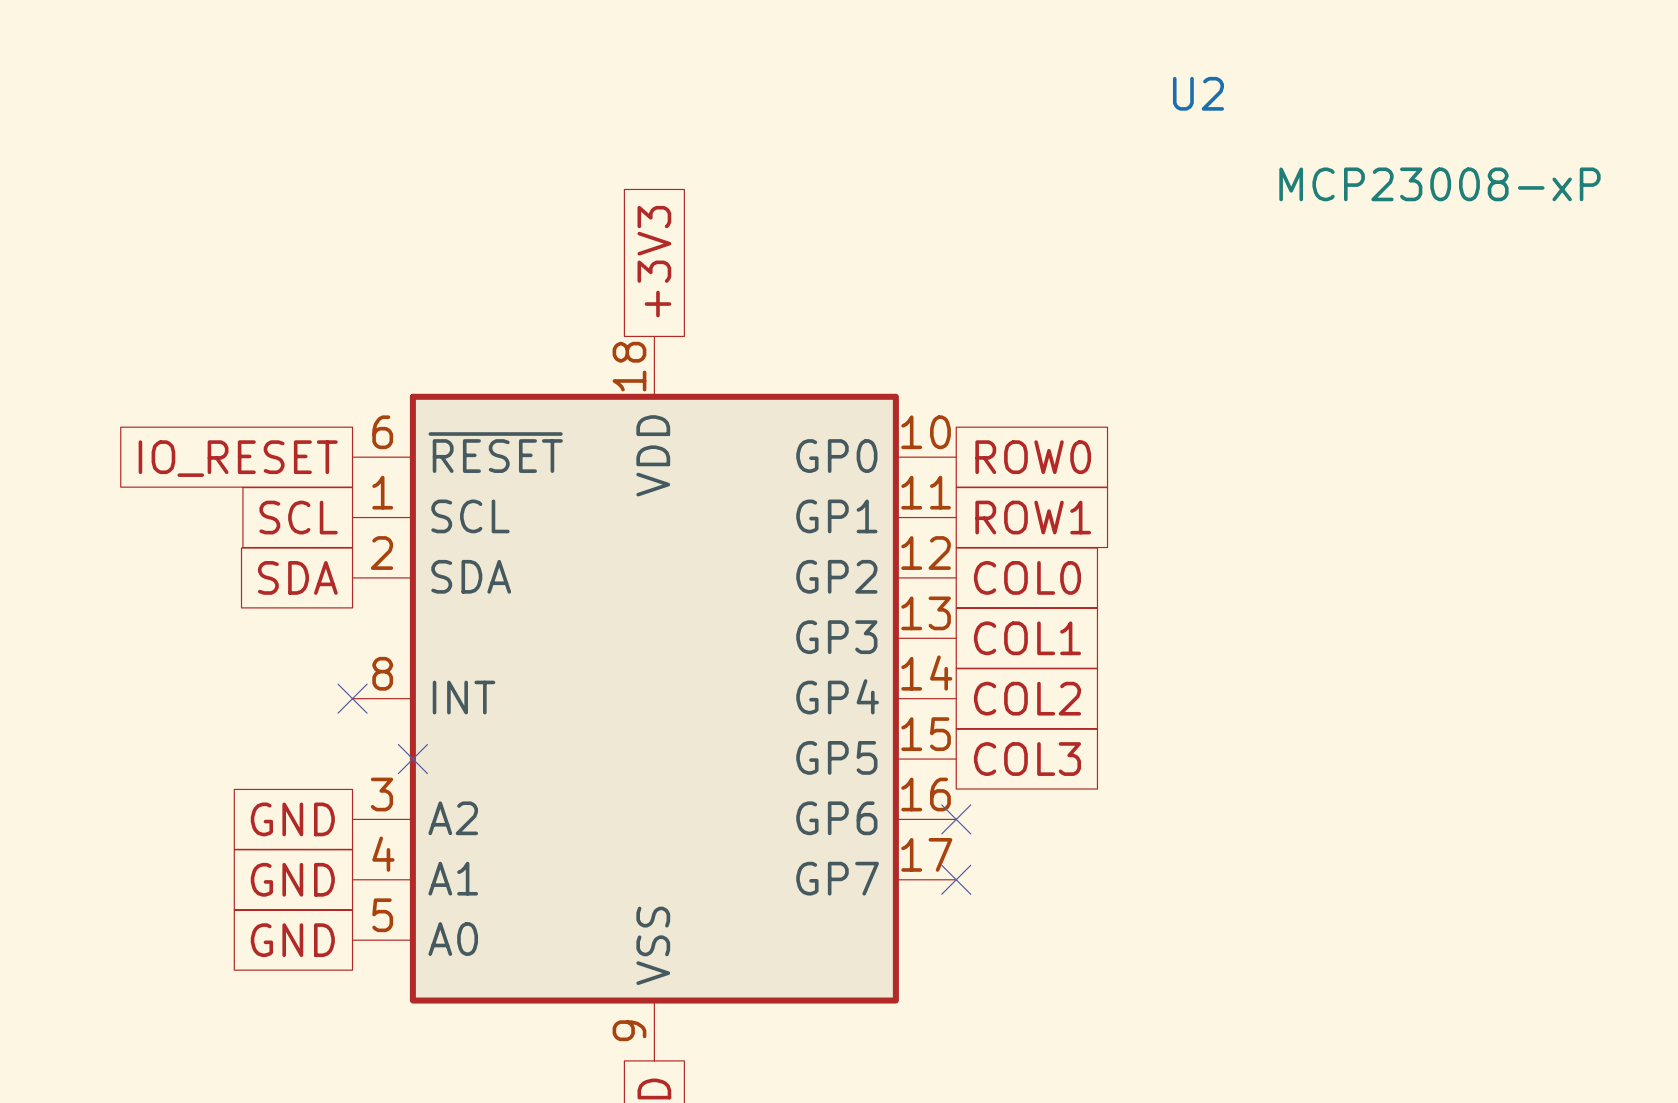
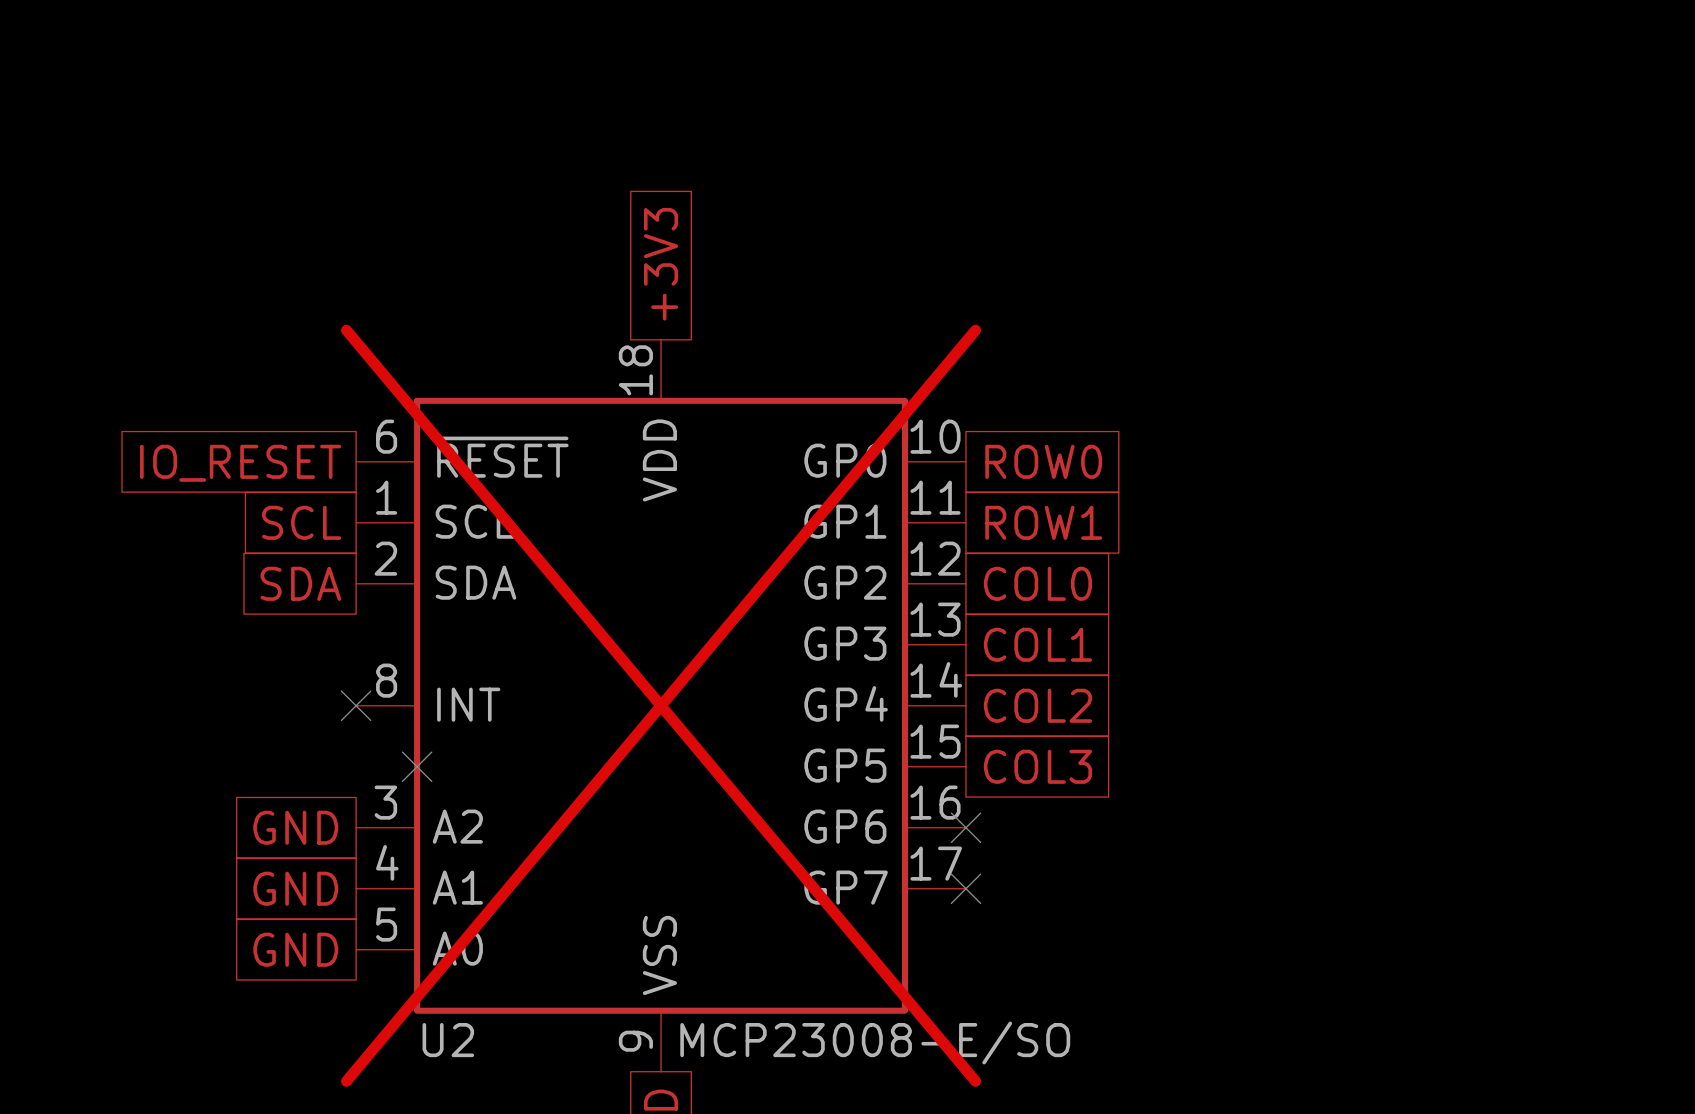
U2 name position: U2 (1198, 93) -> U2 (448, 1040)
U2 value: MCP23008-xP (1439, 184) -> MCP23008-E/SO (875, 1042)
U2 do-not-place cross: none -> (661, 705)

